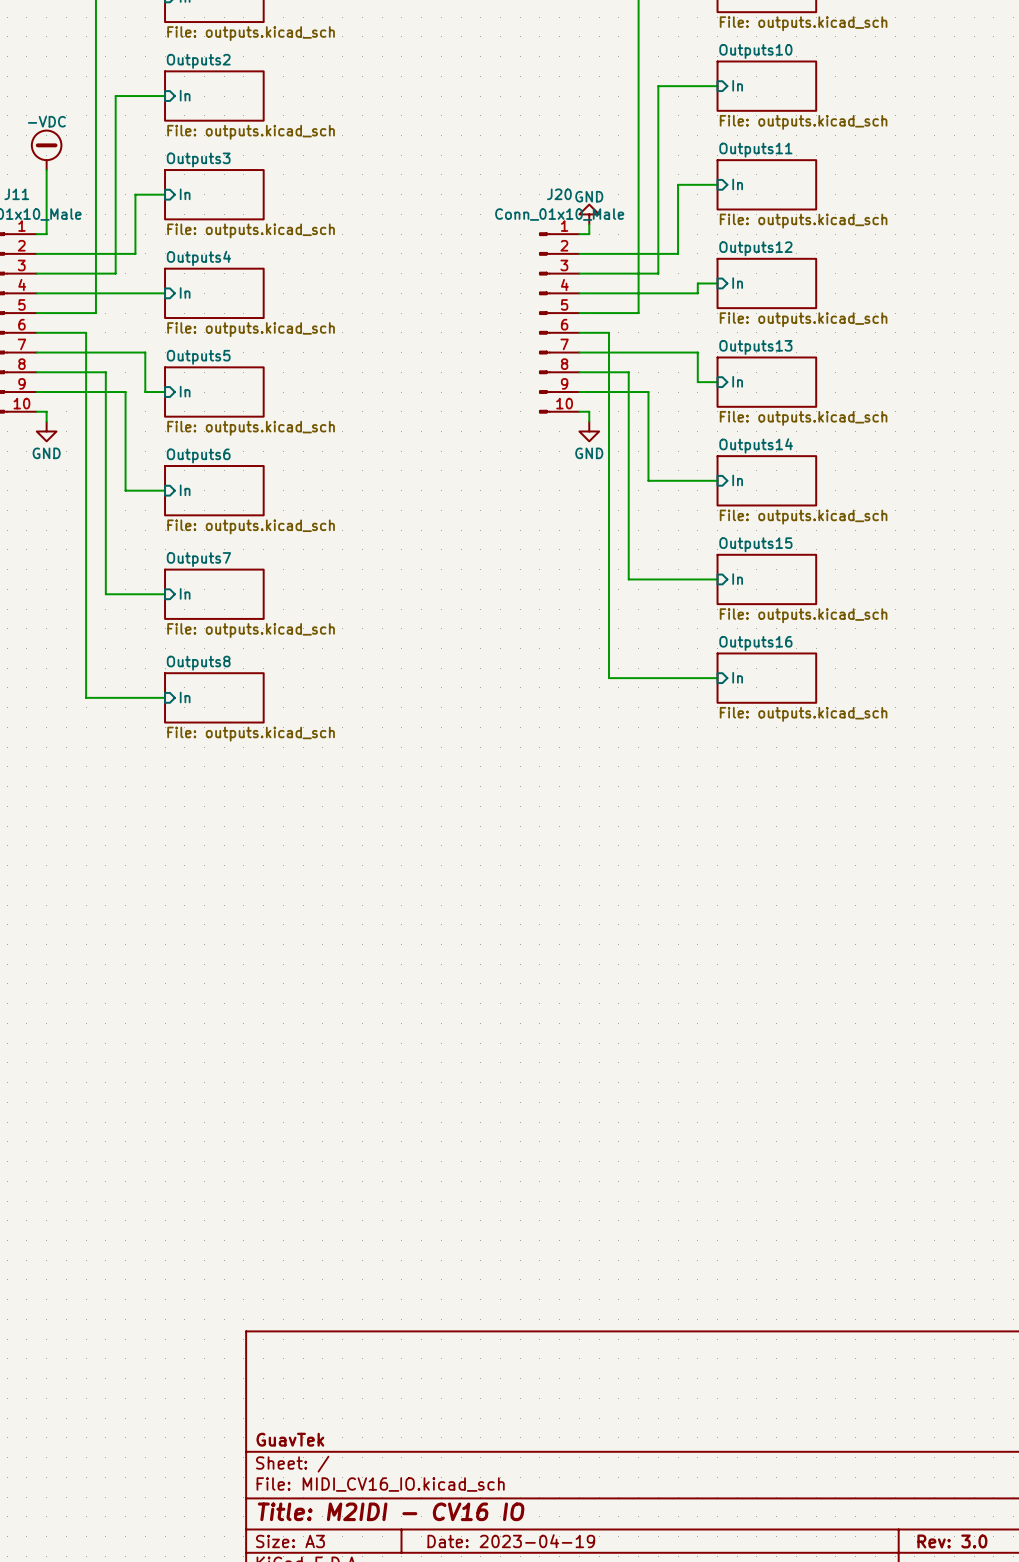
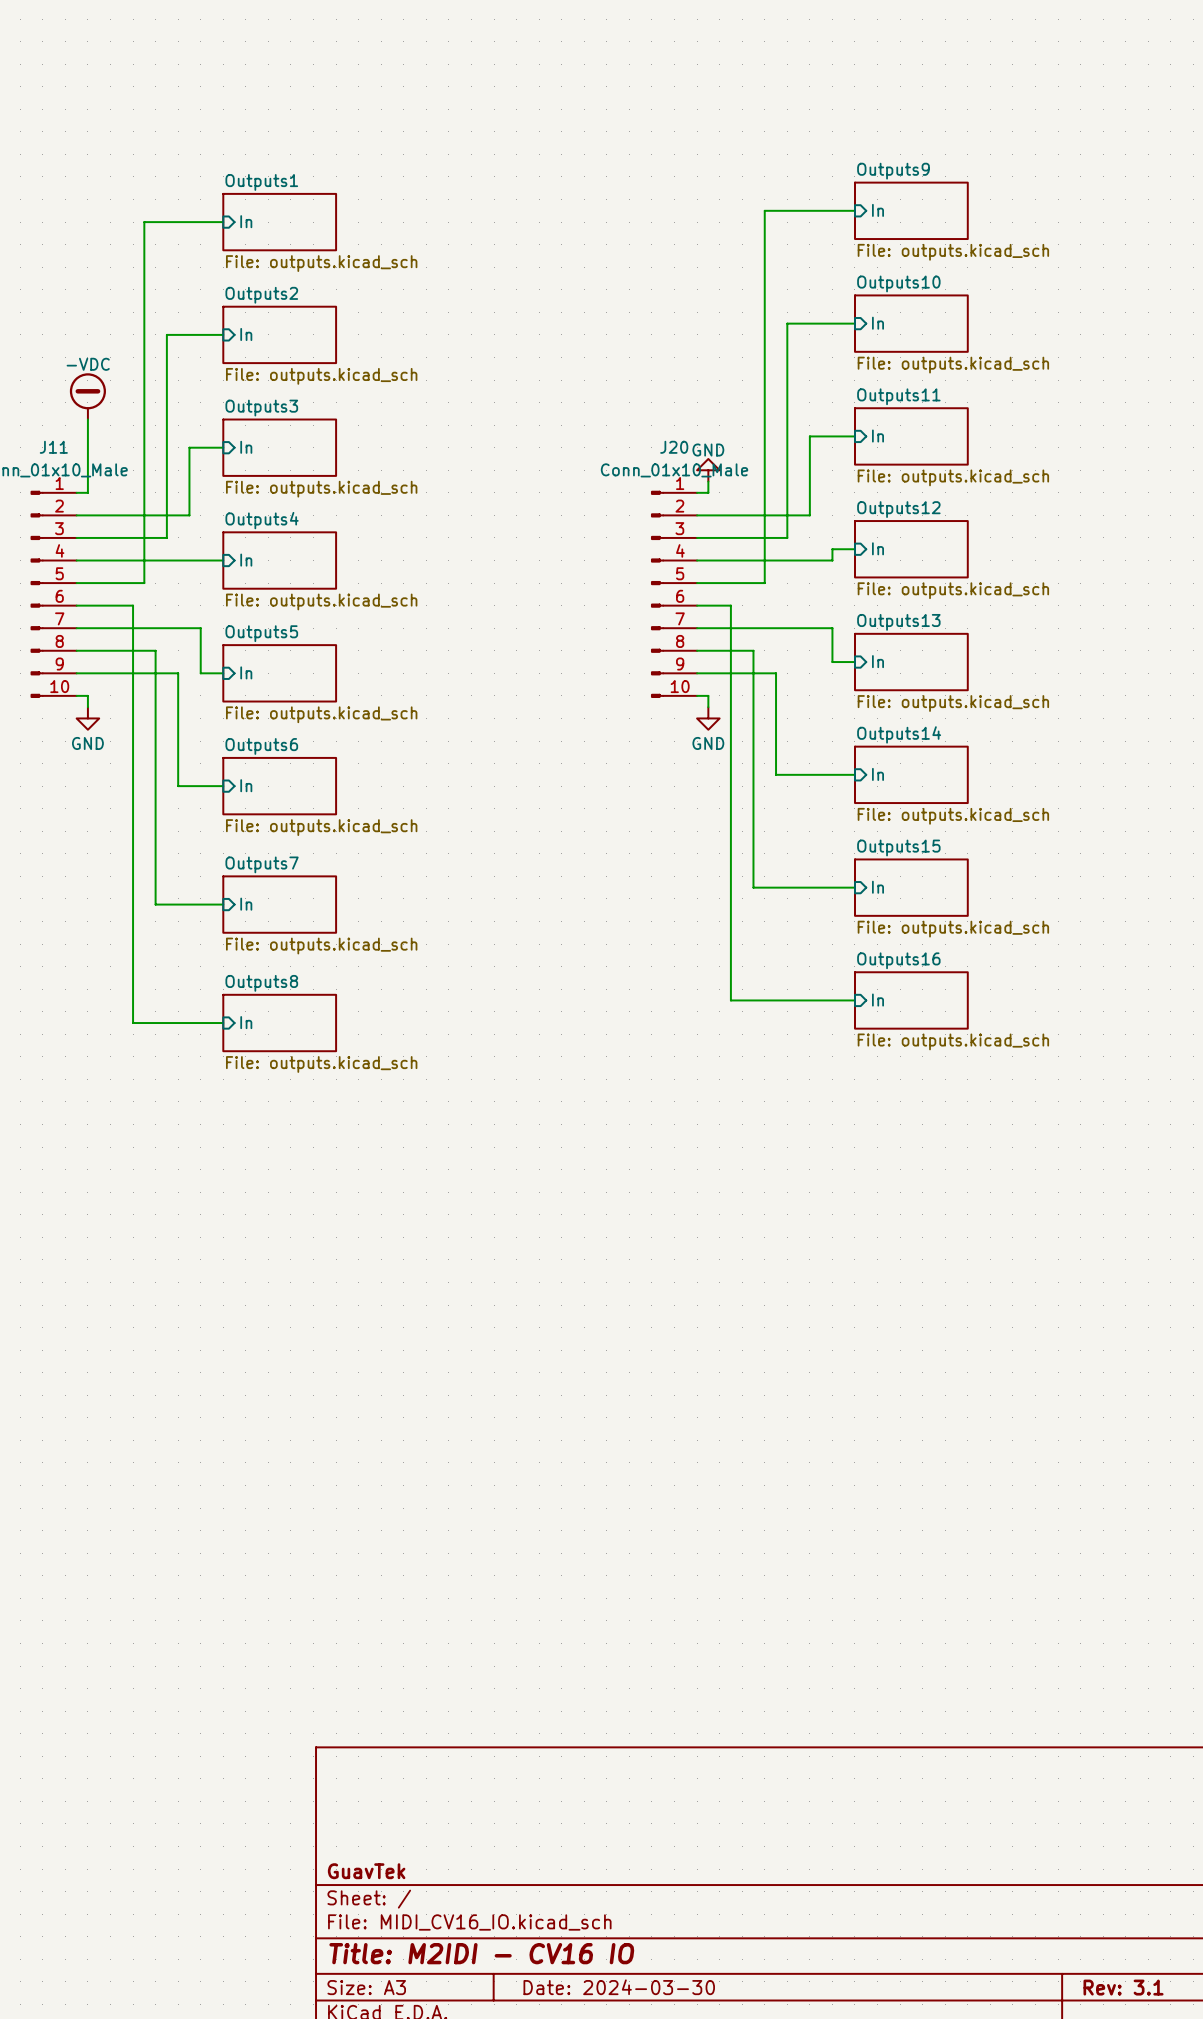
title block: Date: 2023-04-19 (511, 1541) -> Date: 2024-03-30 (619, 1987)
title block: Rev: 3.0 (952, 1541) -> Rev: 3.1 (1123, 1987)

